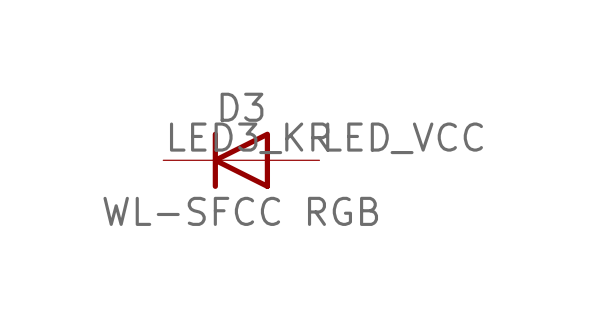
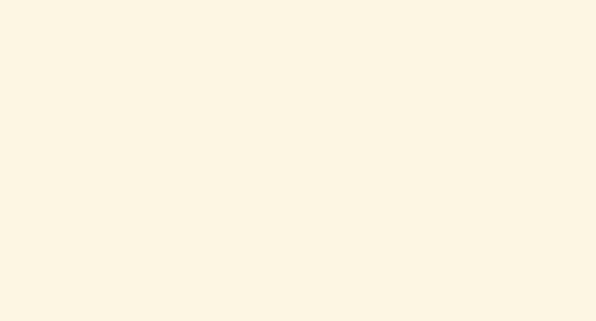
label: LED3_KR (249, 138) -> none
label: LED_VCC (404, 138) -> none
D3: WL-SFCC RGB (241, 160) -> none

